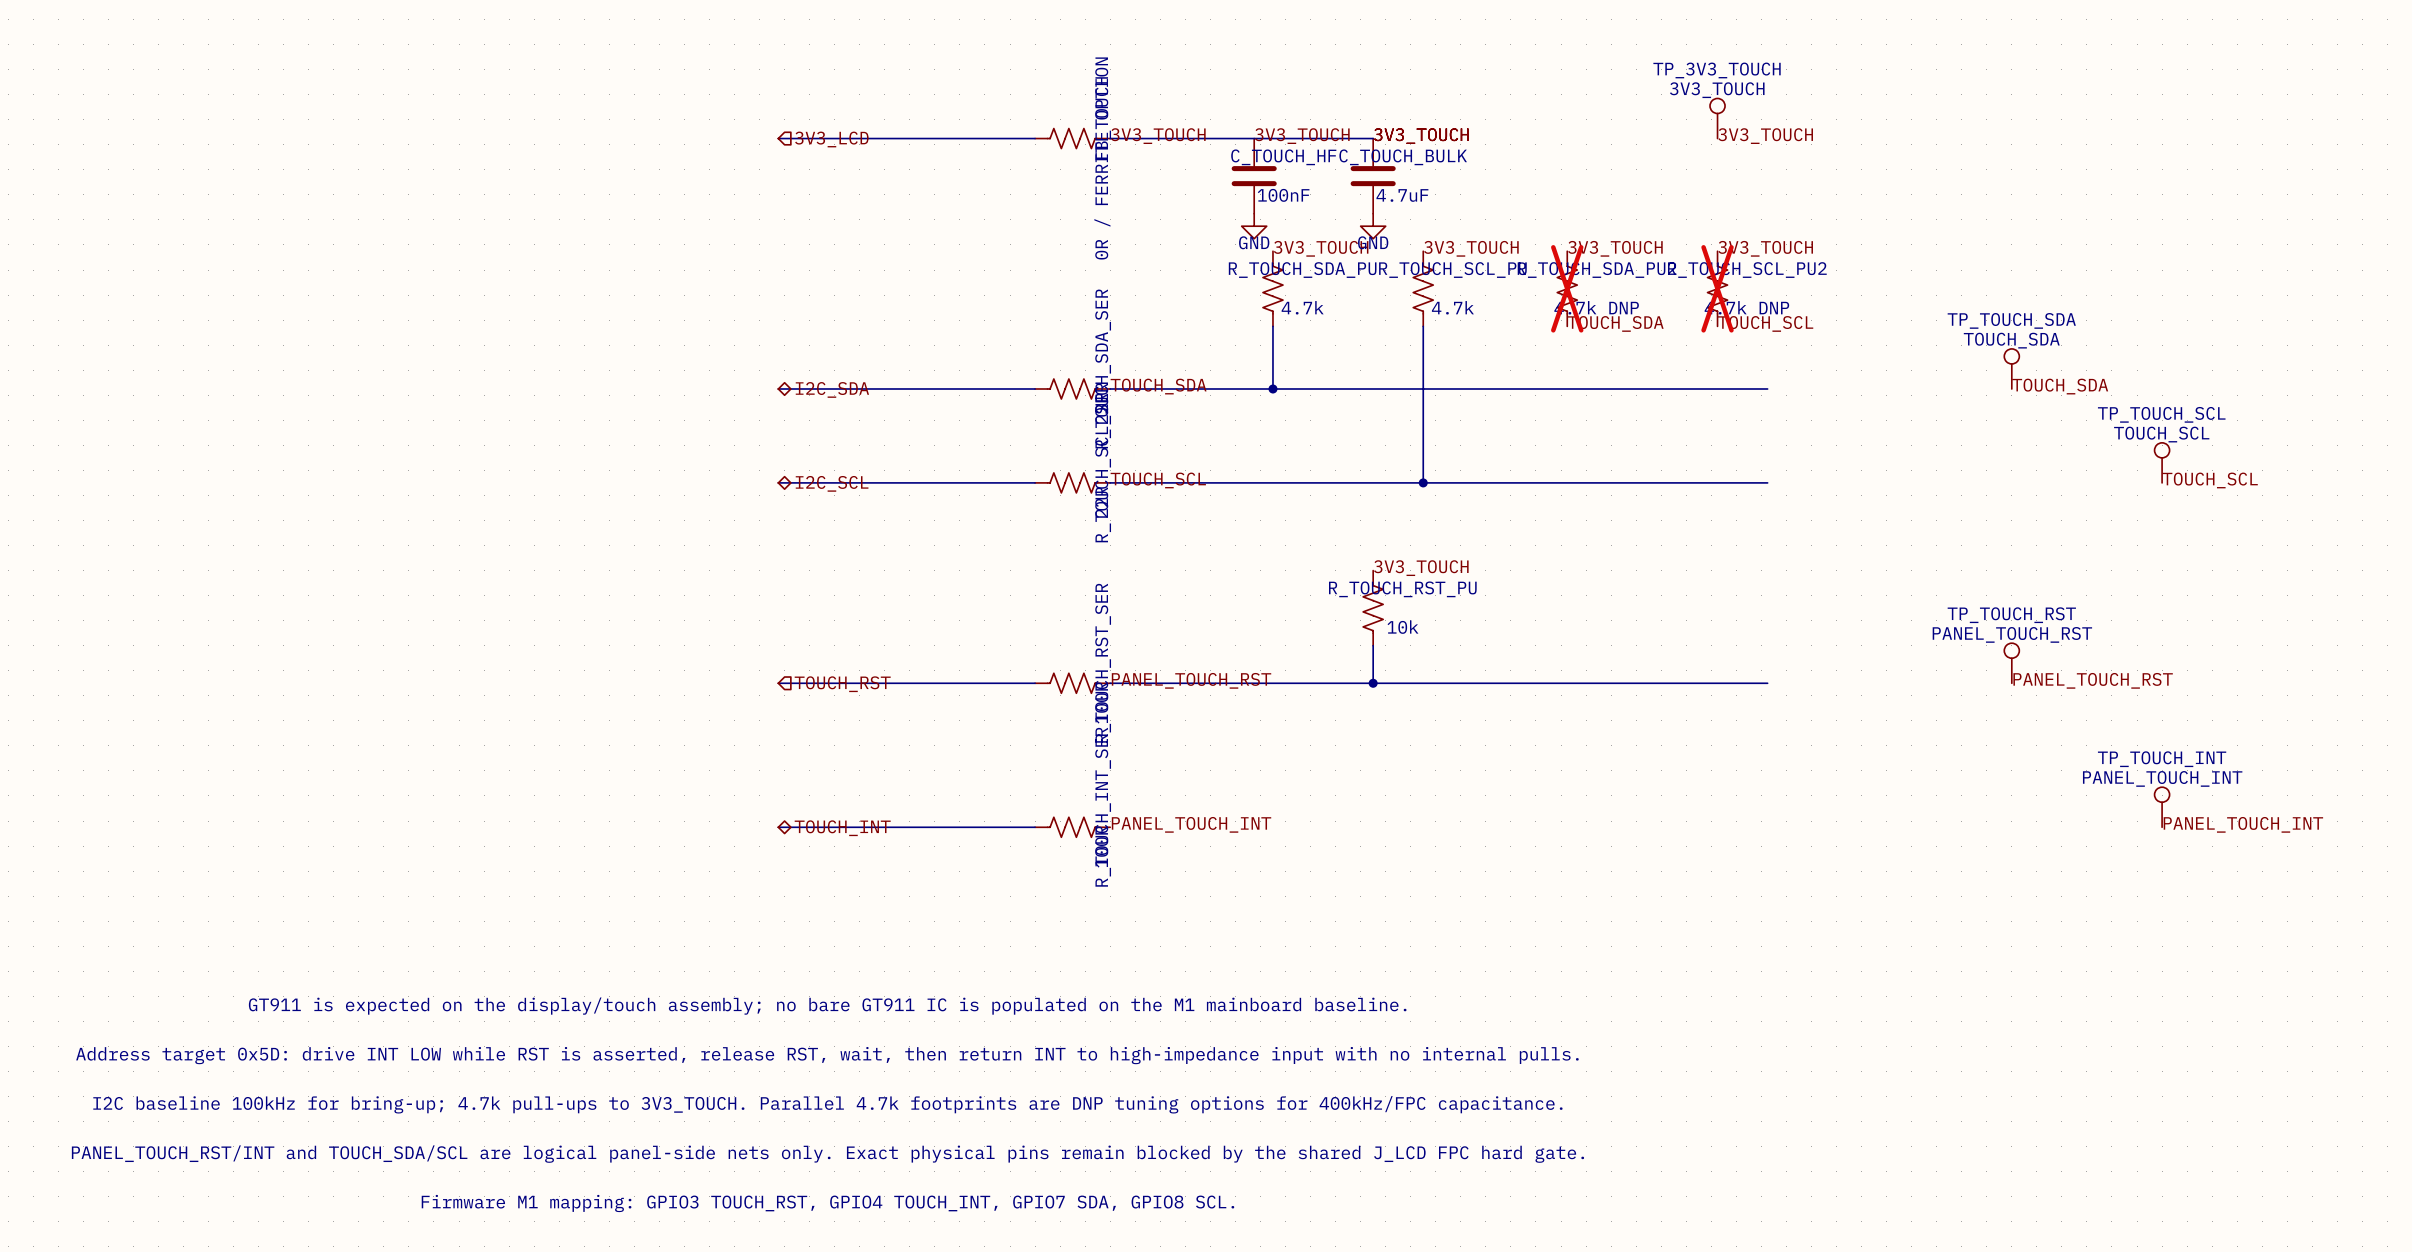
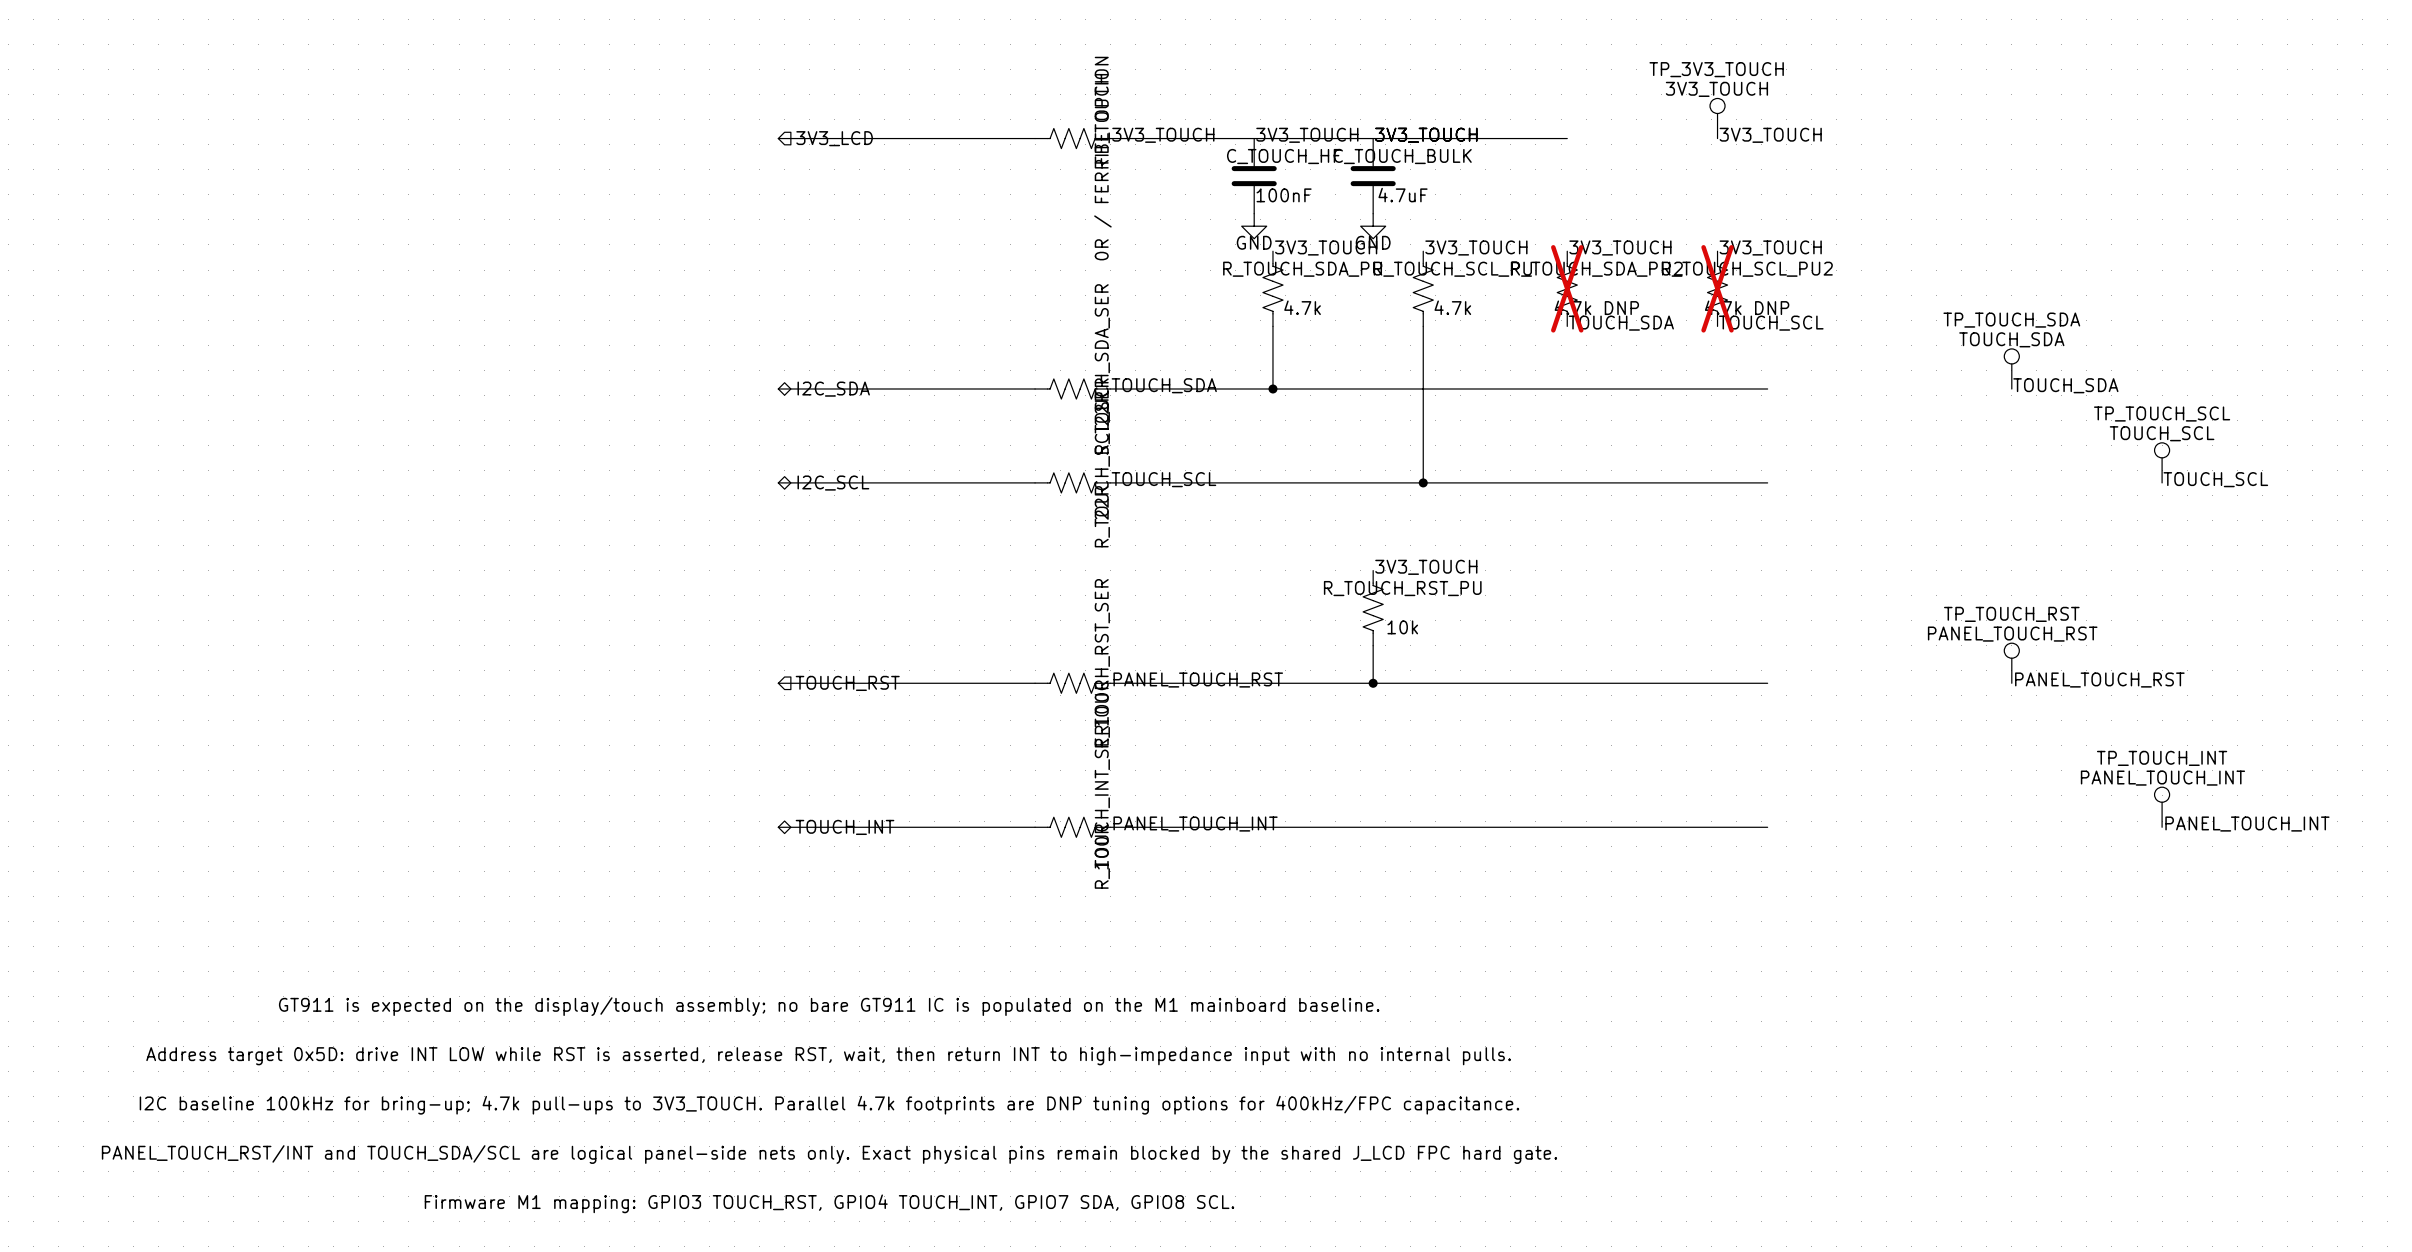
wire: none -> (1373, 138) (1567, 138)
wire: none -> (1110, 827) (1767, 827)

